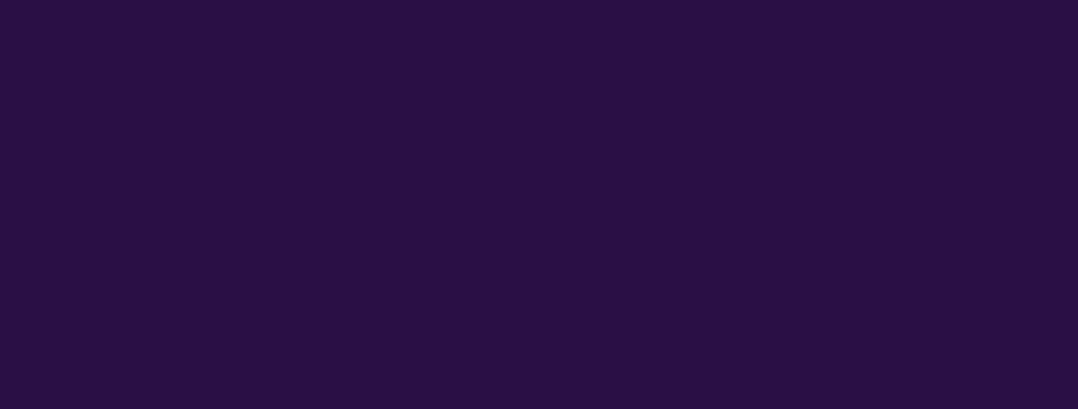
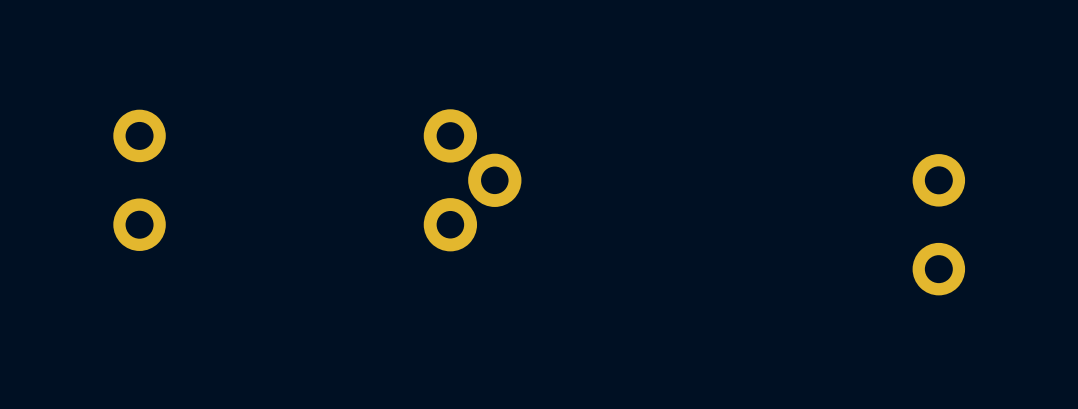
part: none -> (139, 180)
part: none -> (472, 180)
part: none -> (938, 224)

